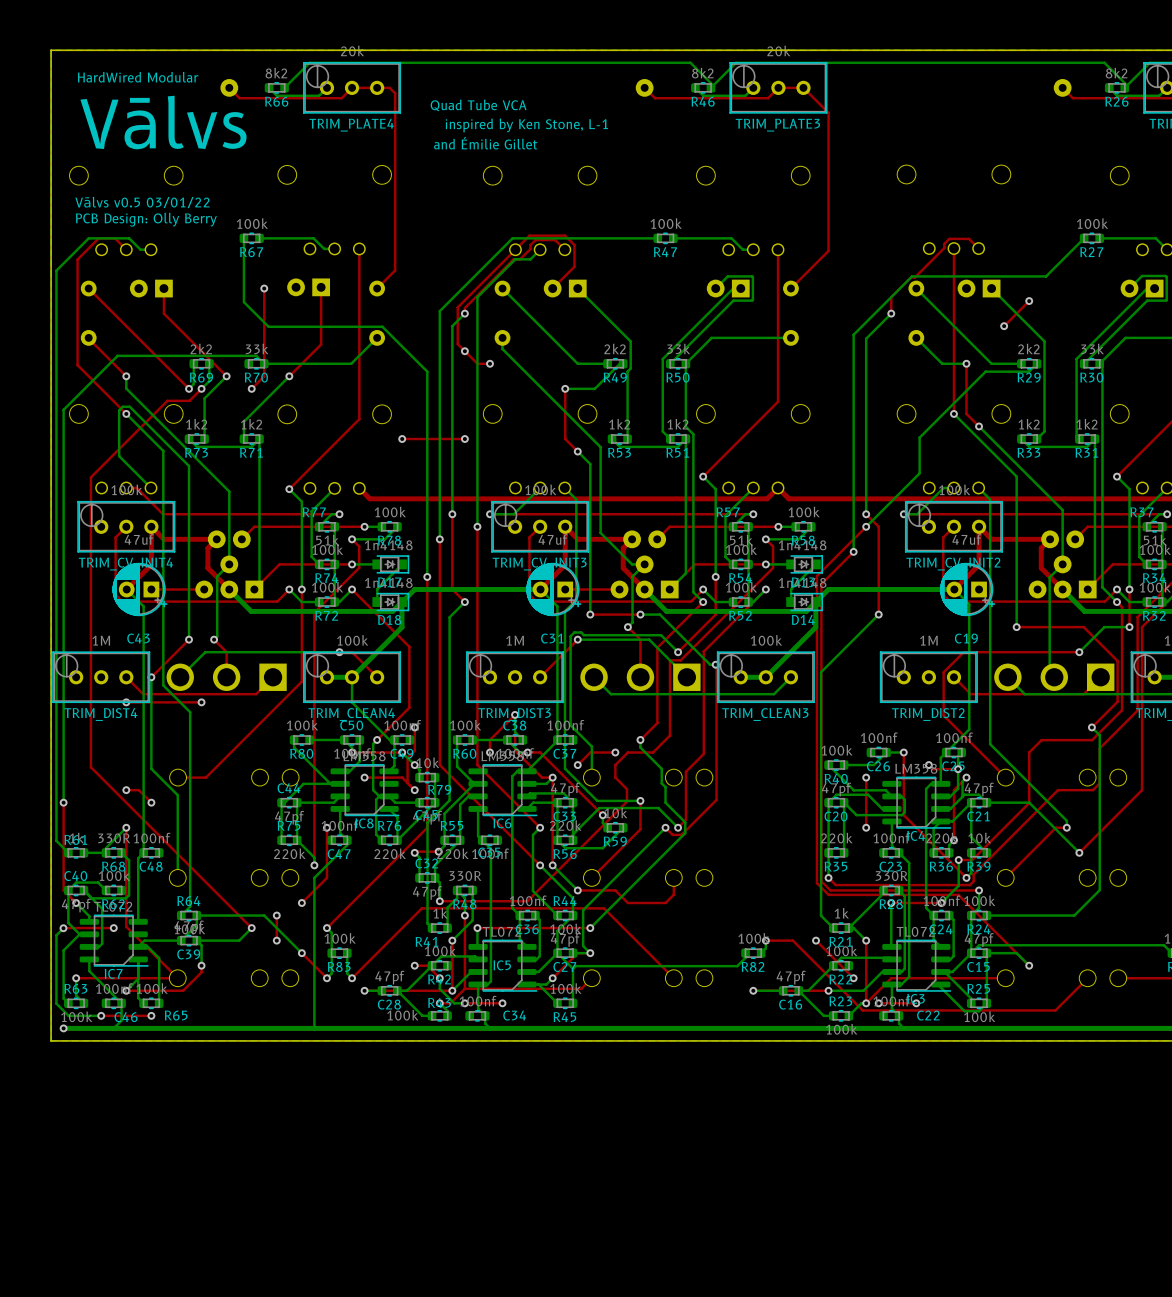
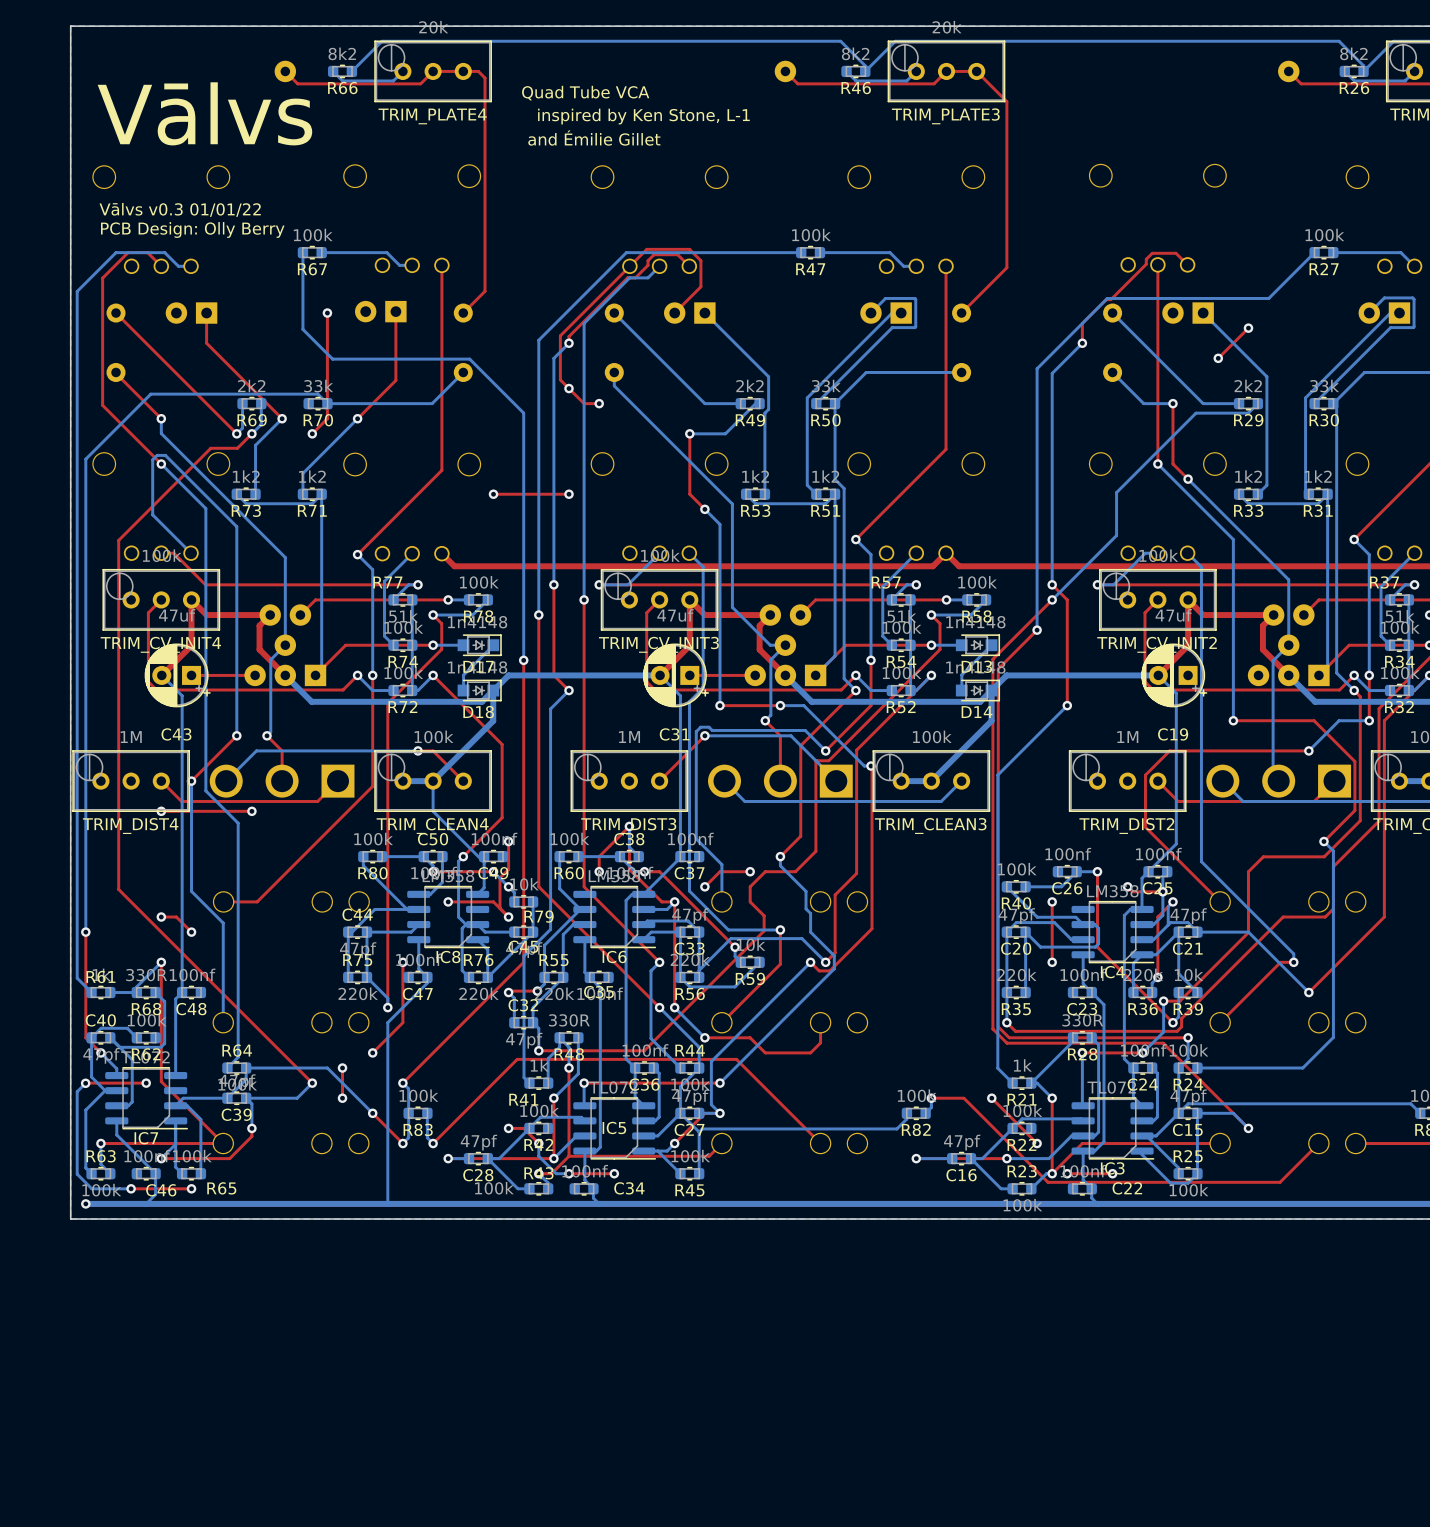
text: HardWired Modular (138, 77) -> none
text: Vālvs v0.5 03/01/22 (142, 202) -> Vālvs v0.3 01/01/22 (180, 209)

